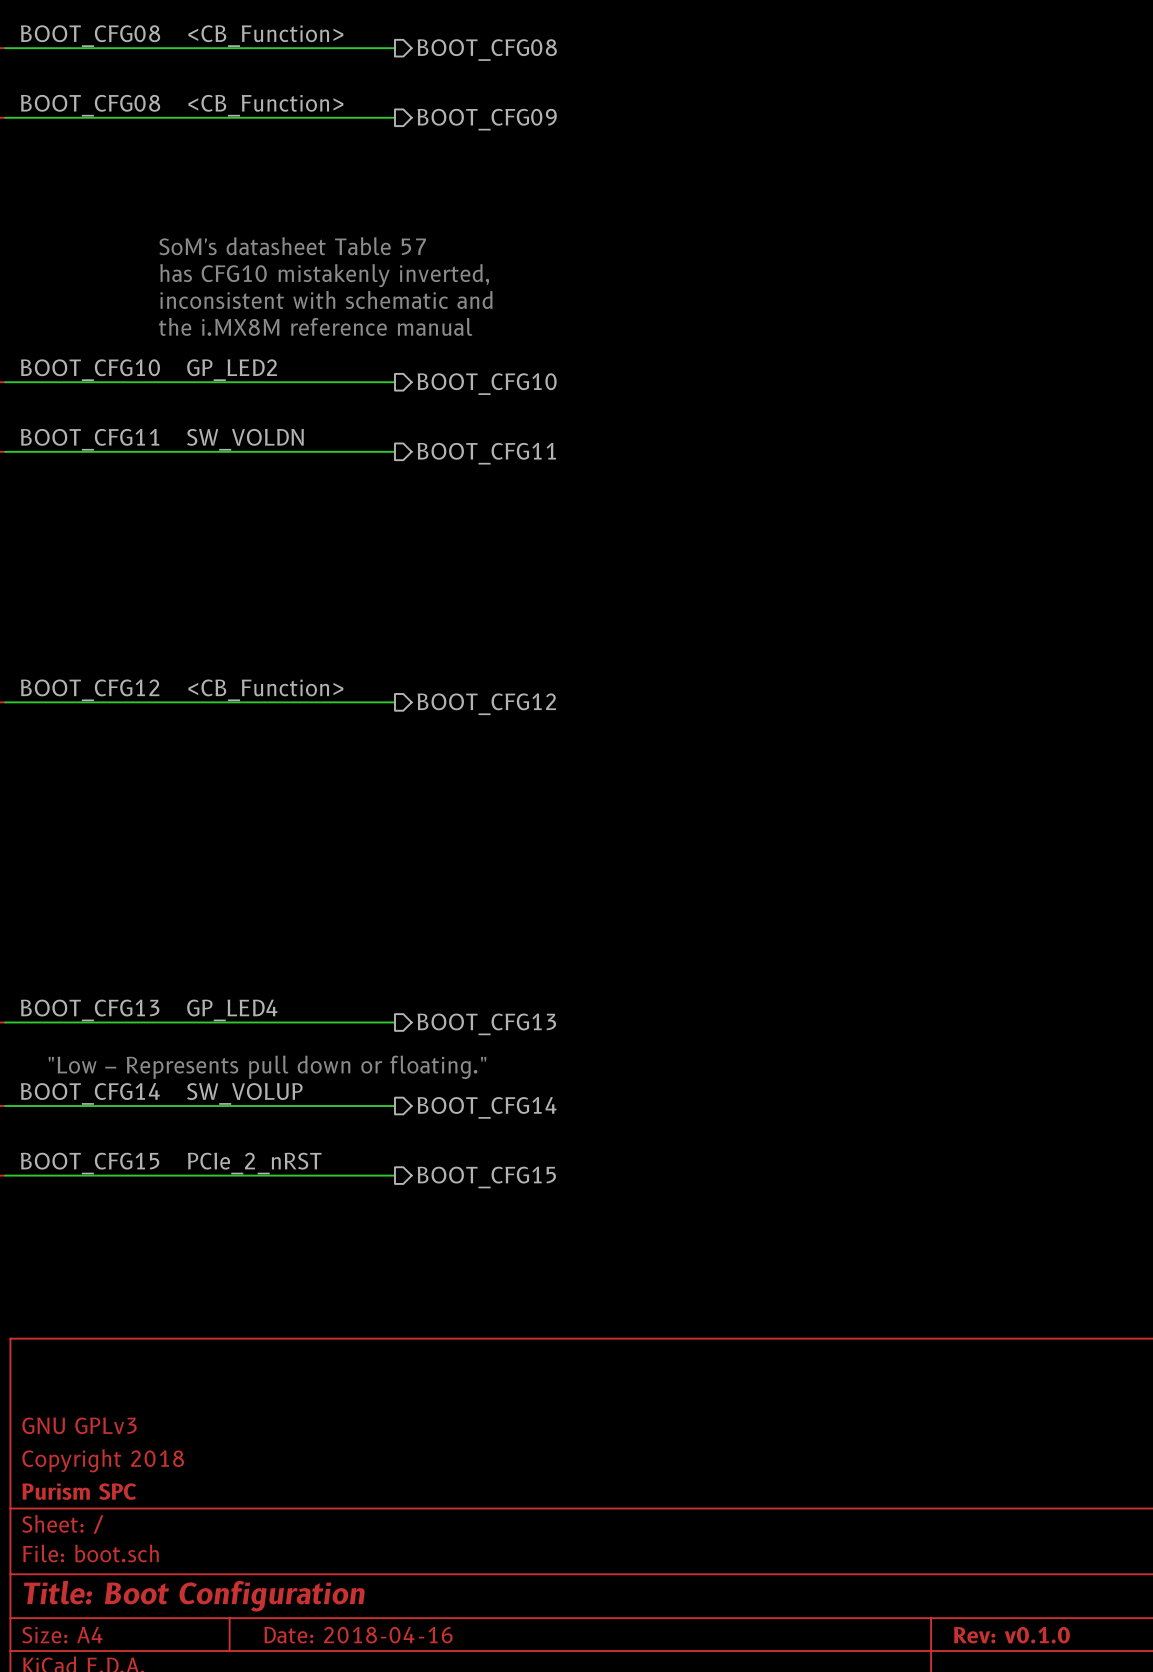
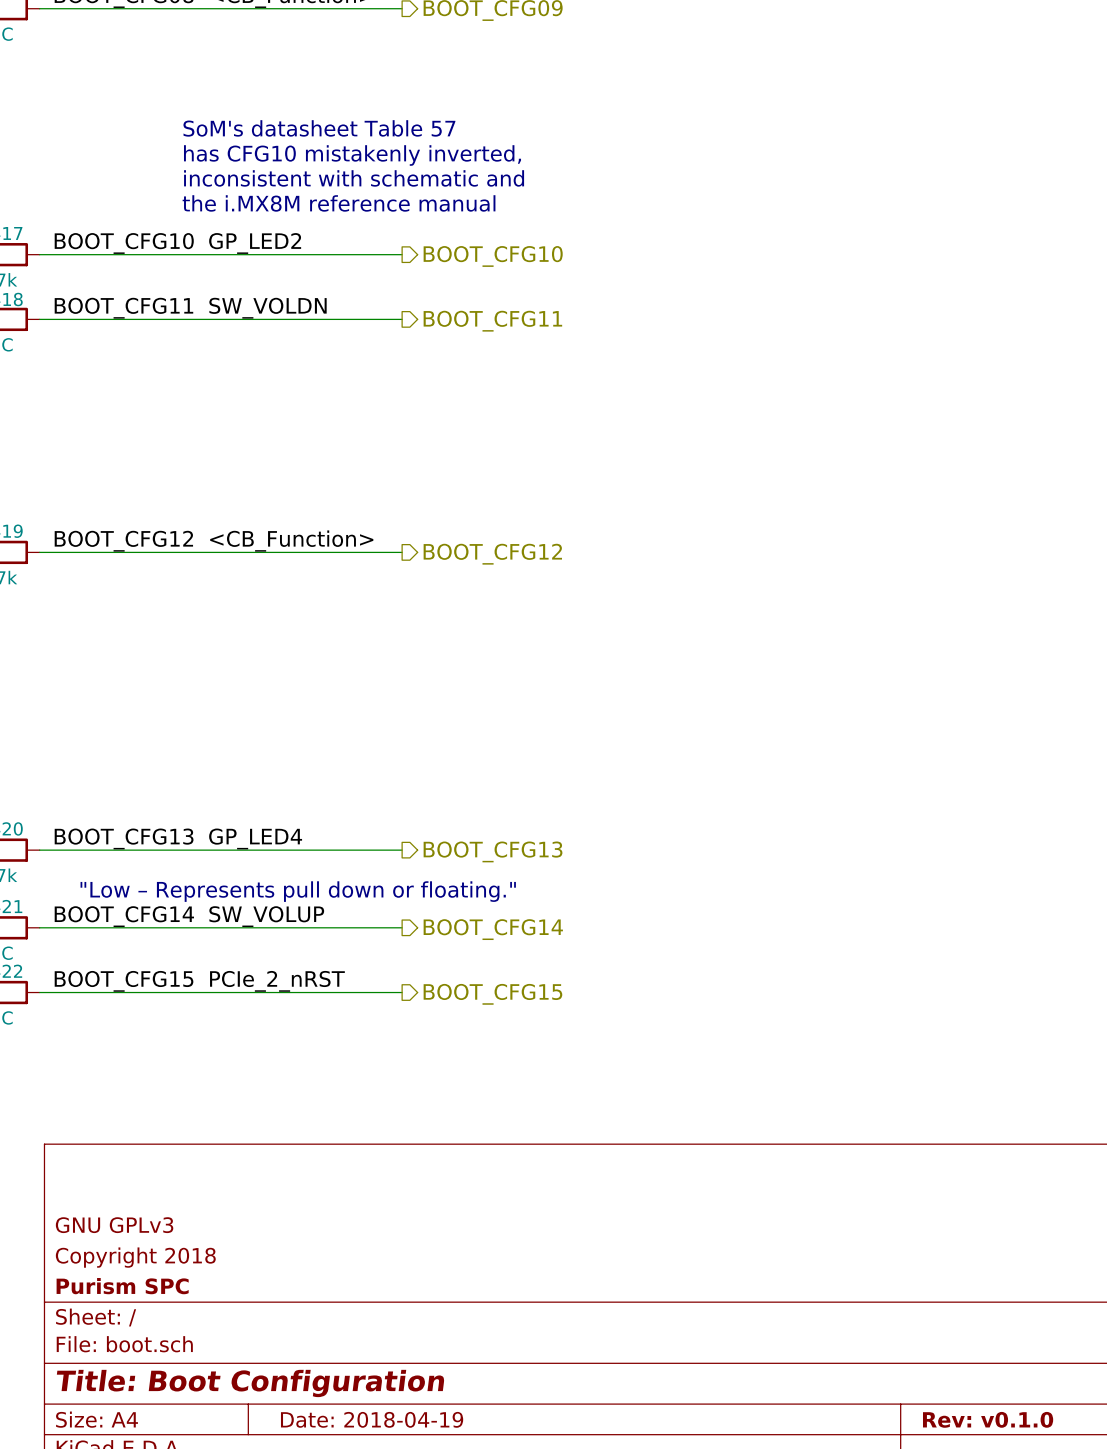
title block: Date: 2018-04-16 (358, 1635) -> Date: 2018-04-19 (372, 1419)

